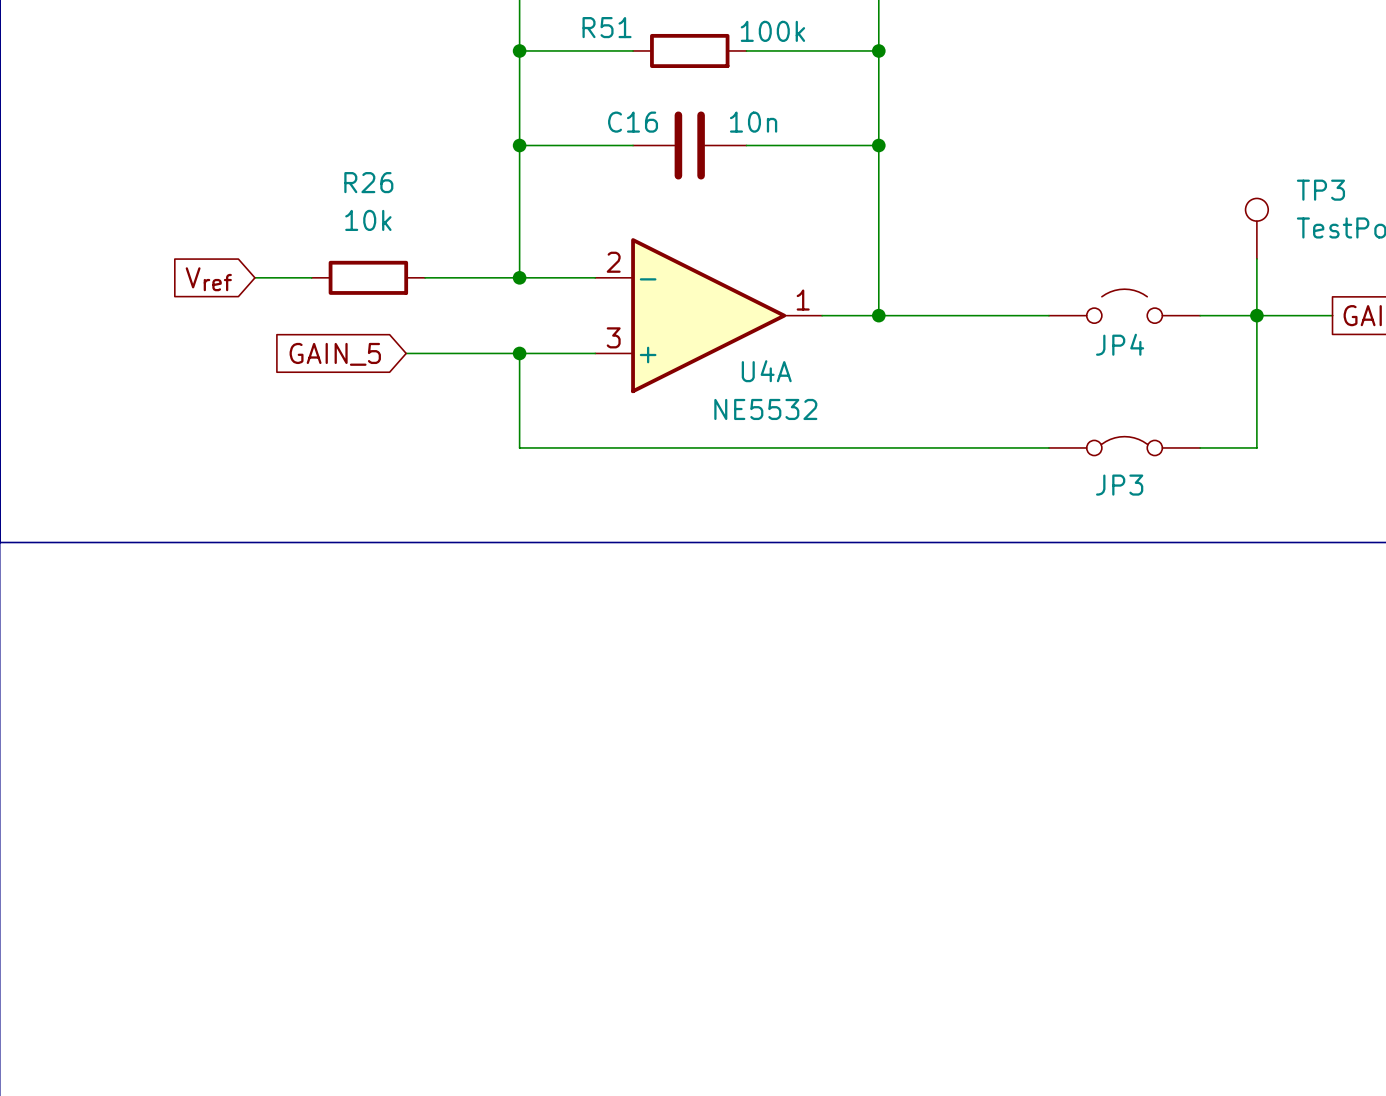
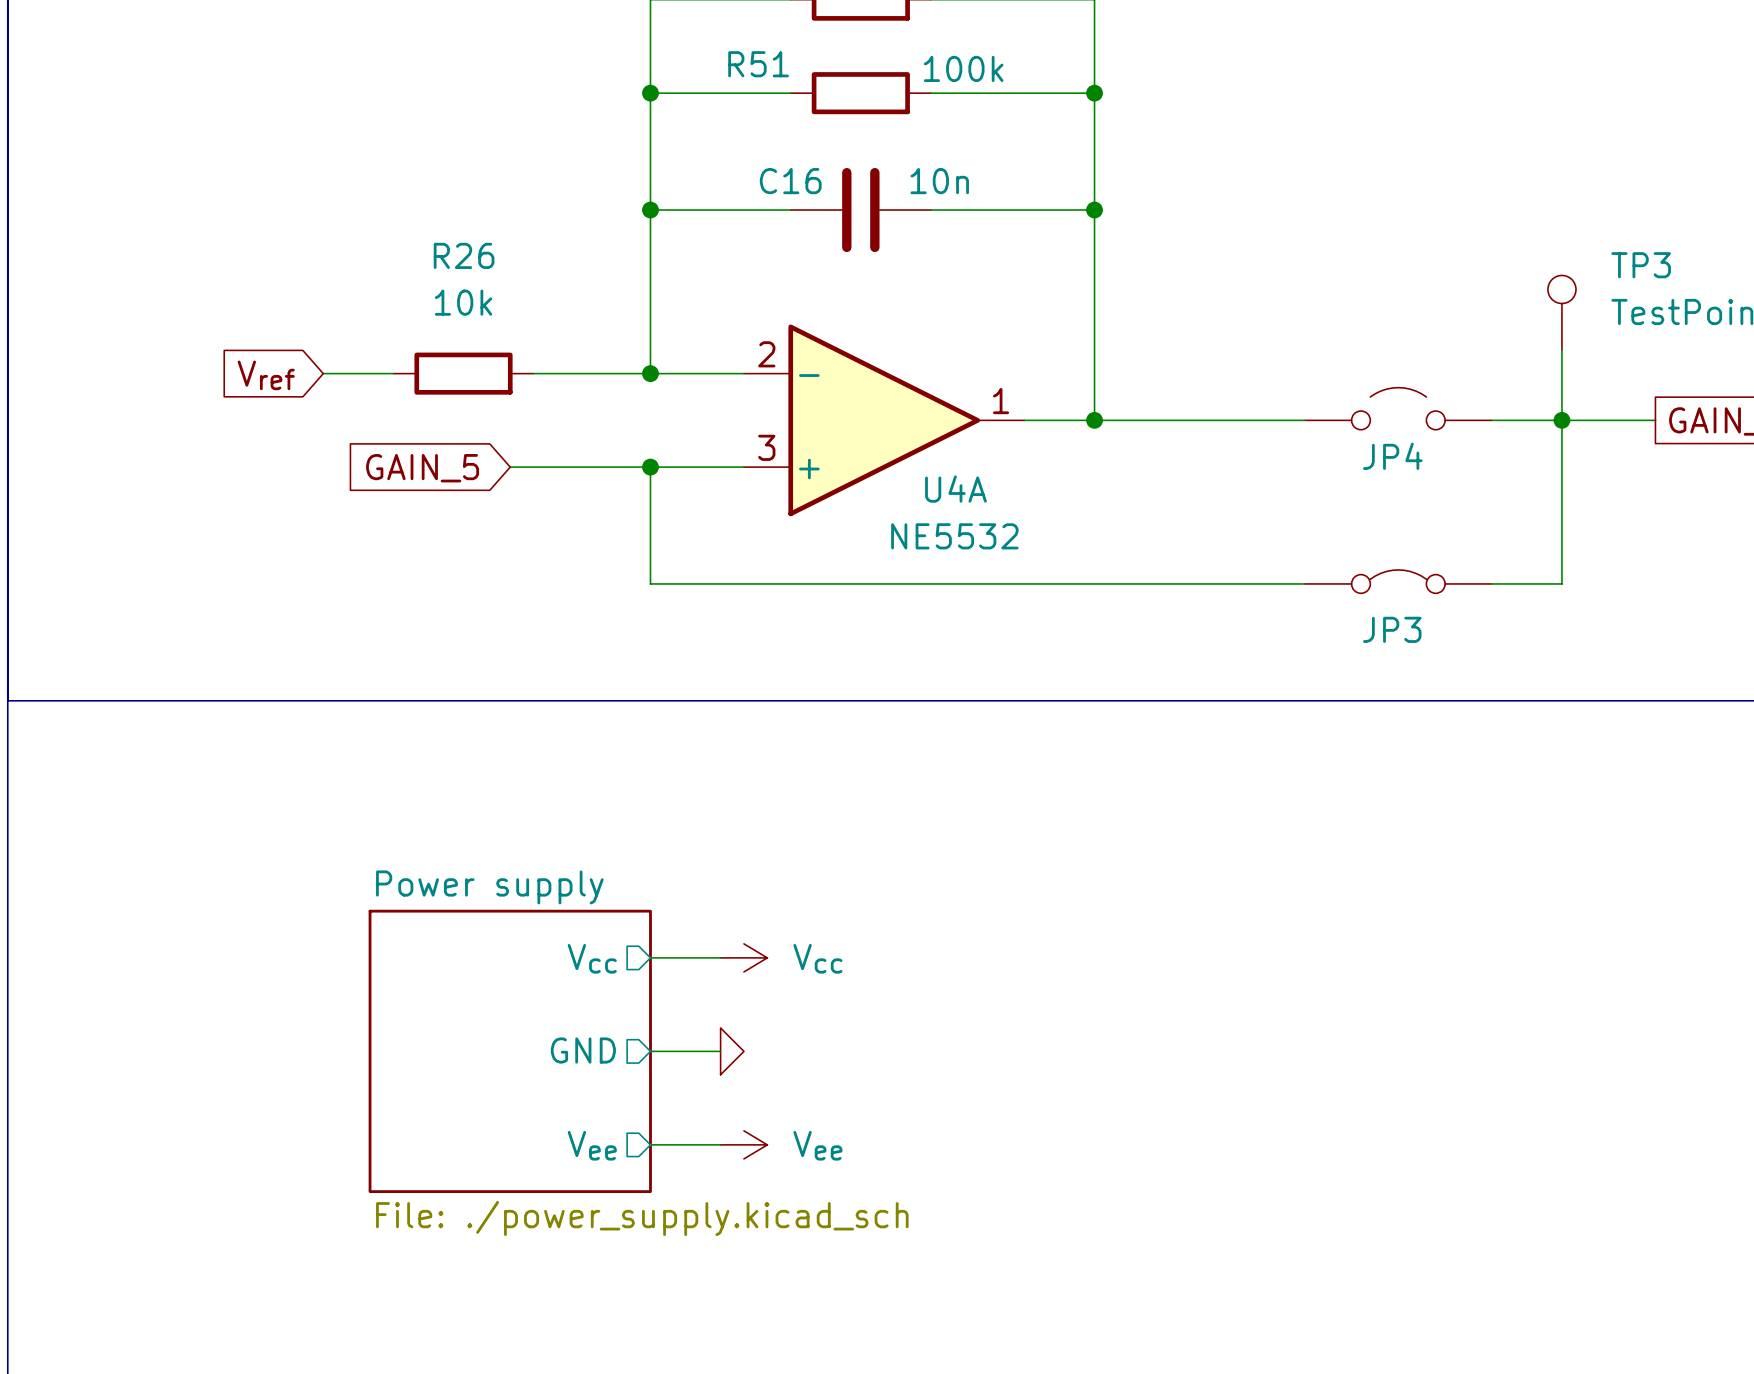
wire: none -> (650, 957) (720, 957)
power symbol: none -> Vcc (743, 957)
sheet pin: none -> Vcc (592, 958)
sheet pin: none -> GND (583, 1050)
sheet Power supply: none -> File: ./power_supply.kicad_sch (510, 1051)
wire: none -> (650, 1051) (720, 1051)
power symbol: none -> (732, 1051)
wire: none -> (650, 1144) (720, 1144)
power symbol: none -> Vee (743, 1144)
sheet pin: none -> Vee (592, 1145)

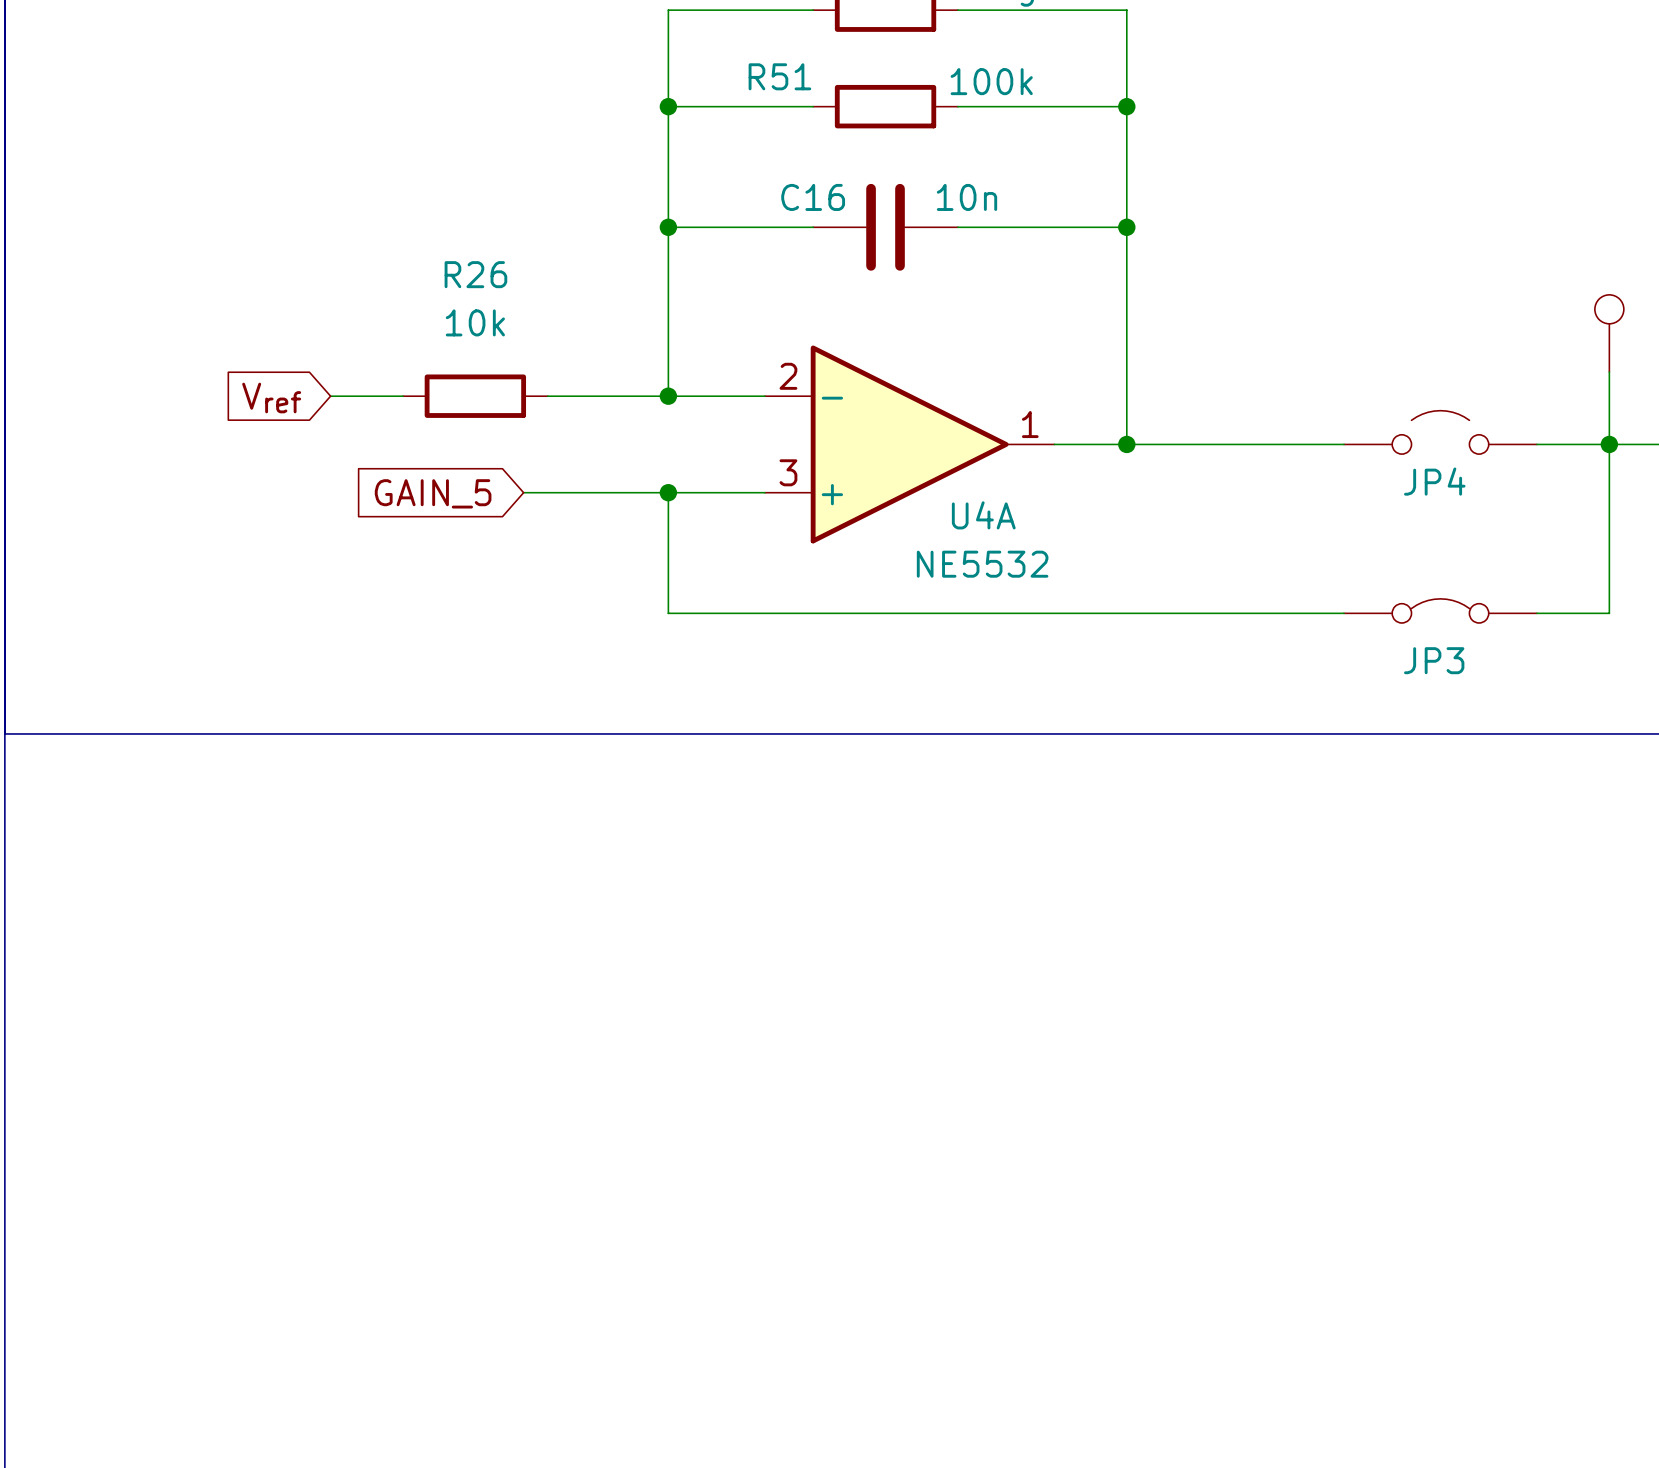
wire: (650, 957) (720, 957) -> none
power symbol: Vcc (743, 957) -> none
sheet pin: Vcc (592, 958) -> none
sheet pin: GND (583, 1050) -> none
sheet Power supply: File: ./power_supply.kicad_sch (510, 1051) -> none
wire: (650, 1051) (720, 1051) -> none
power symbol: (732, 1051) -> none
wire: (650, 1144) (720, 1144) -> none
power symbol: Vee (743, 1144) -> none
sheet pin: Vee (592, 1145) -> none

